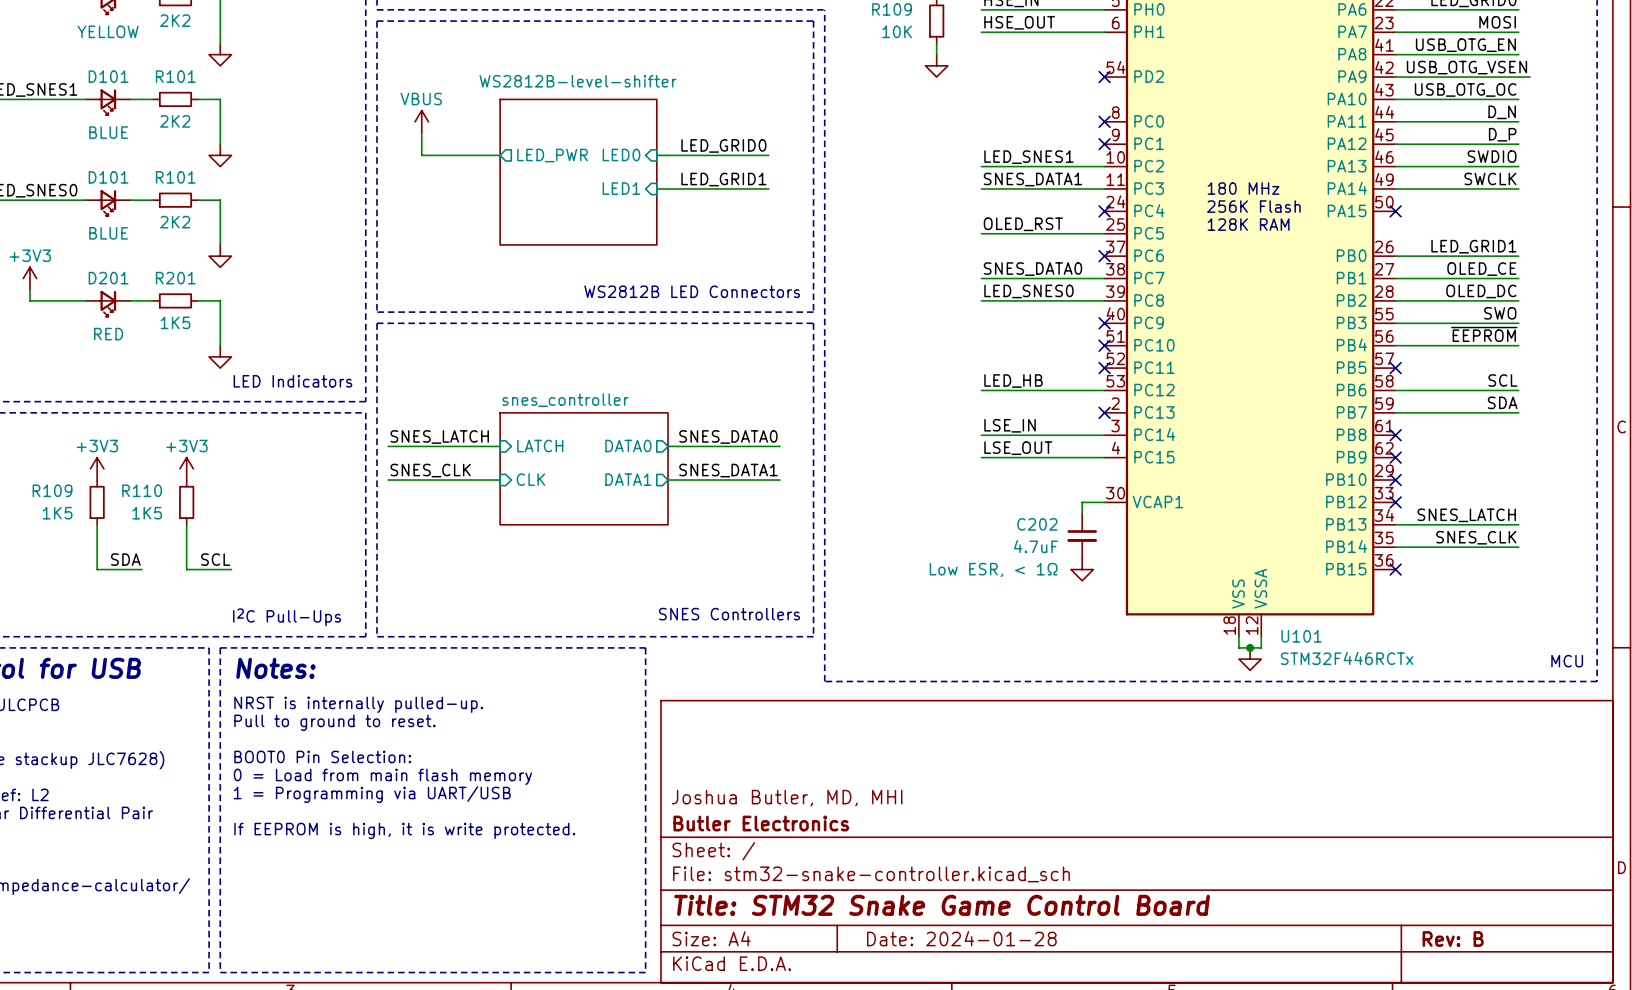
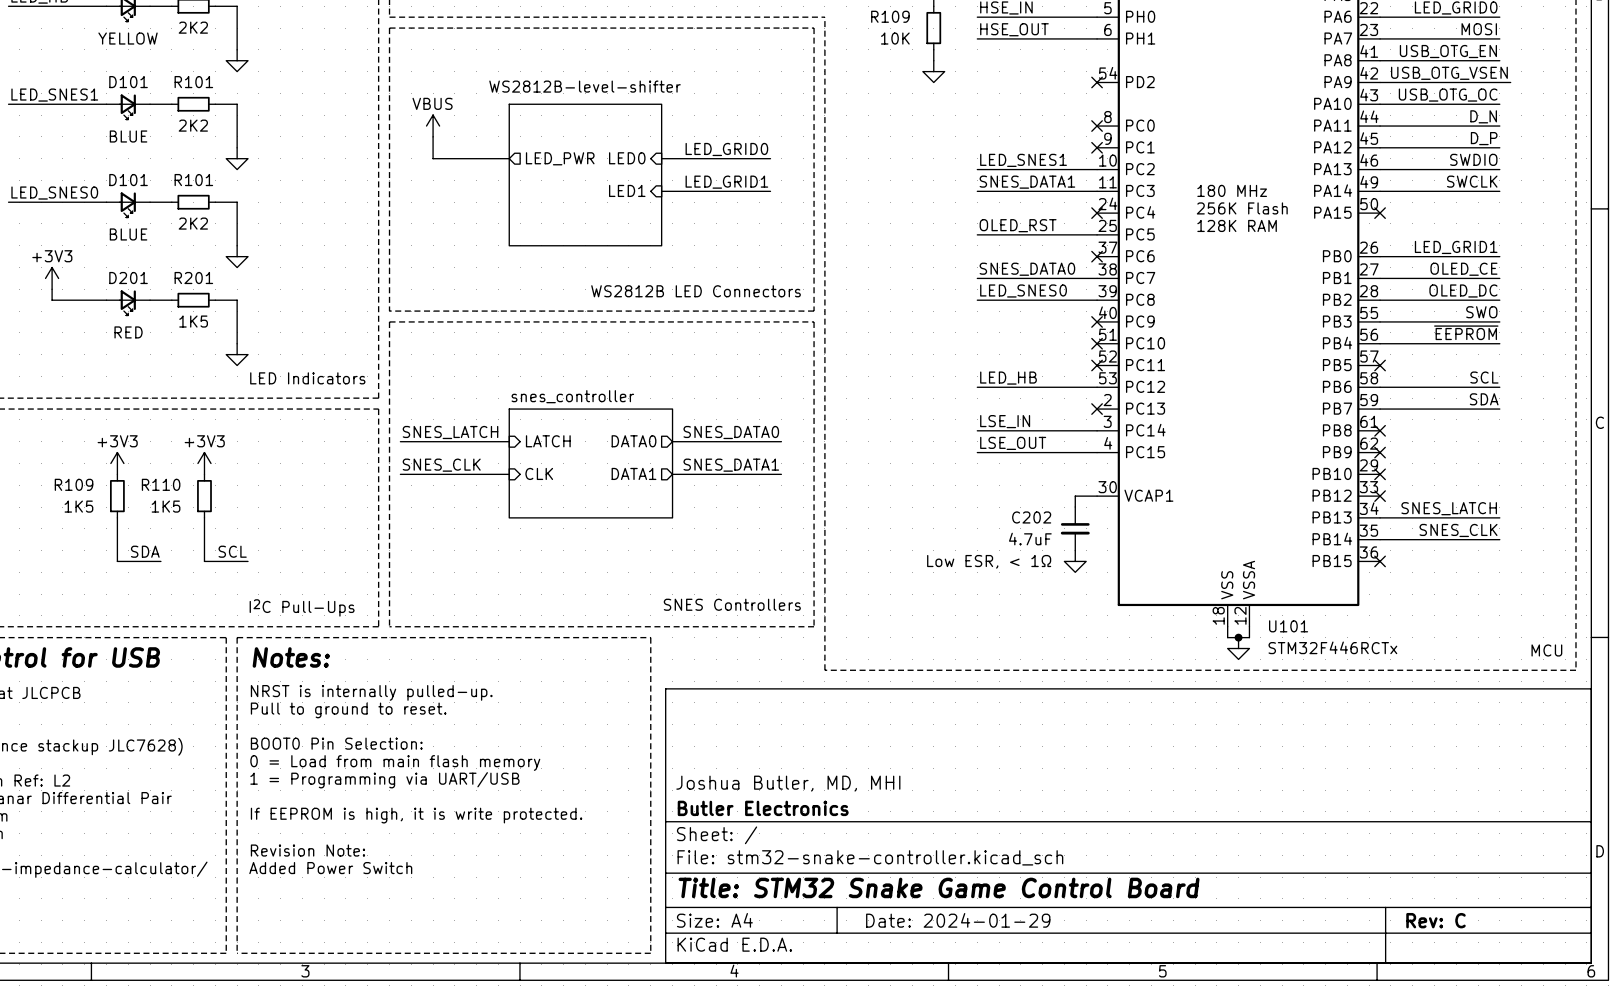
text: none -> Revision Note: (307, 850)
text: none -> Added Power Switch (330, 868)
title block: Date: 2024-01-28 (961, 938) -> Date: 2024-01-29 (958, 920)
title block: Rev: B (1453, 939) -> Rev: C (1435, 920)

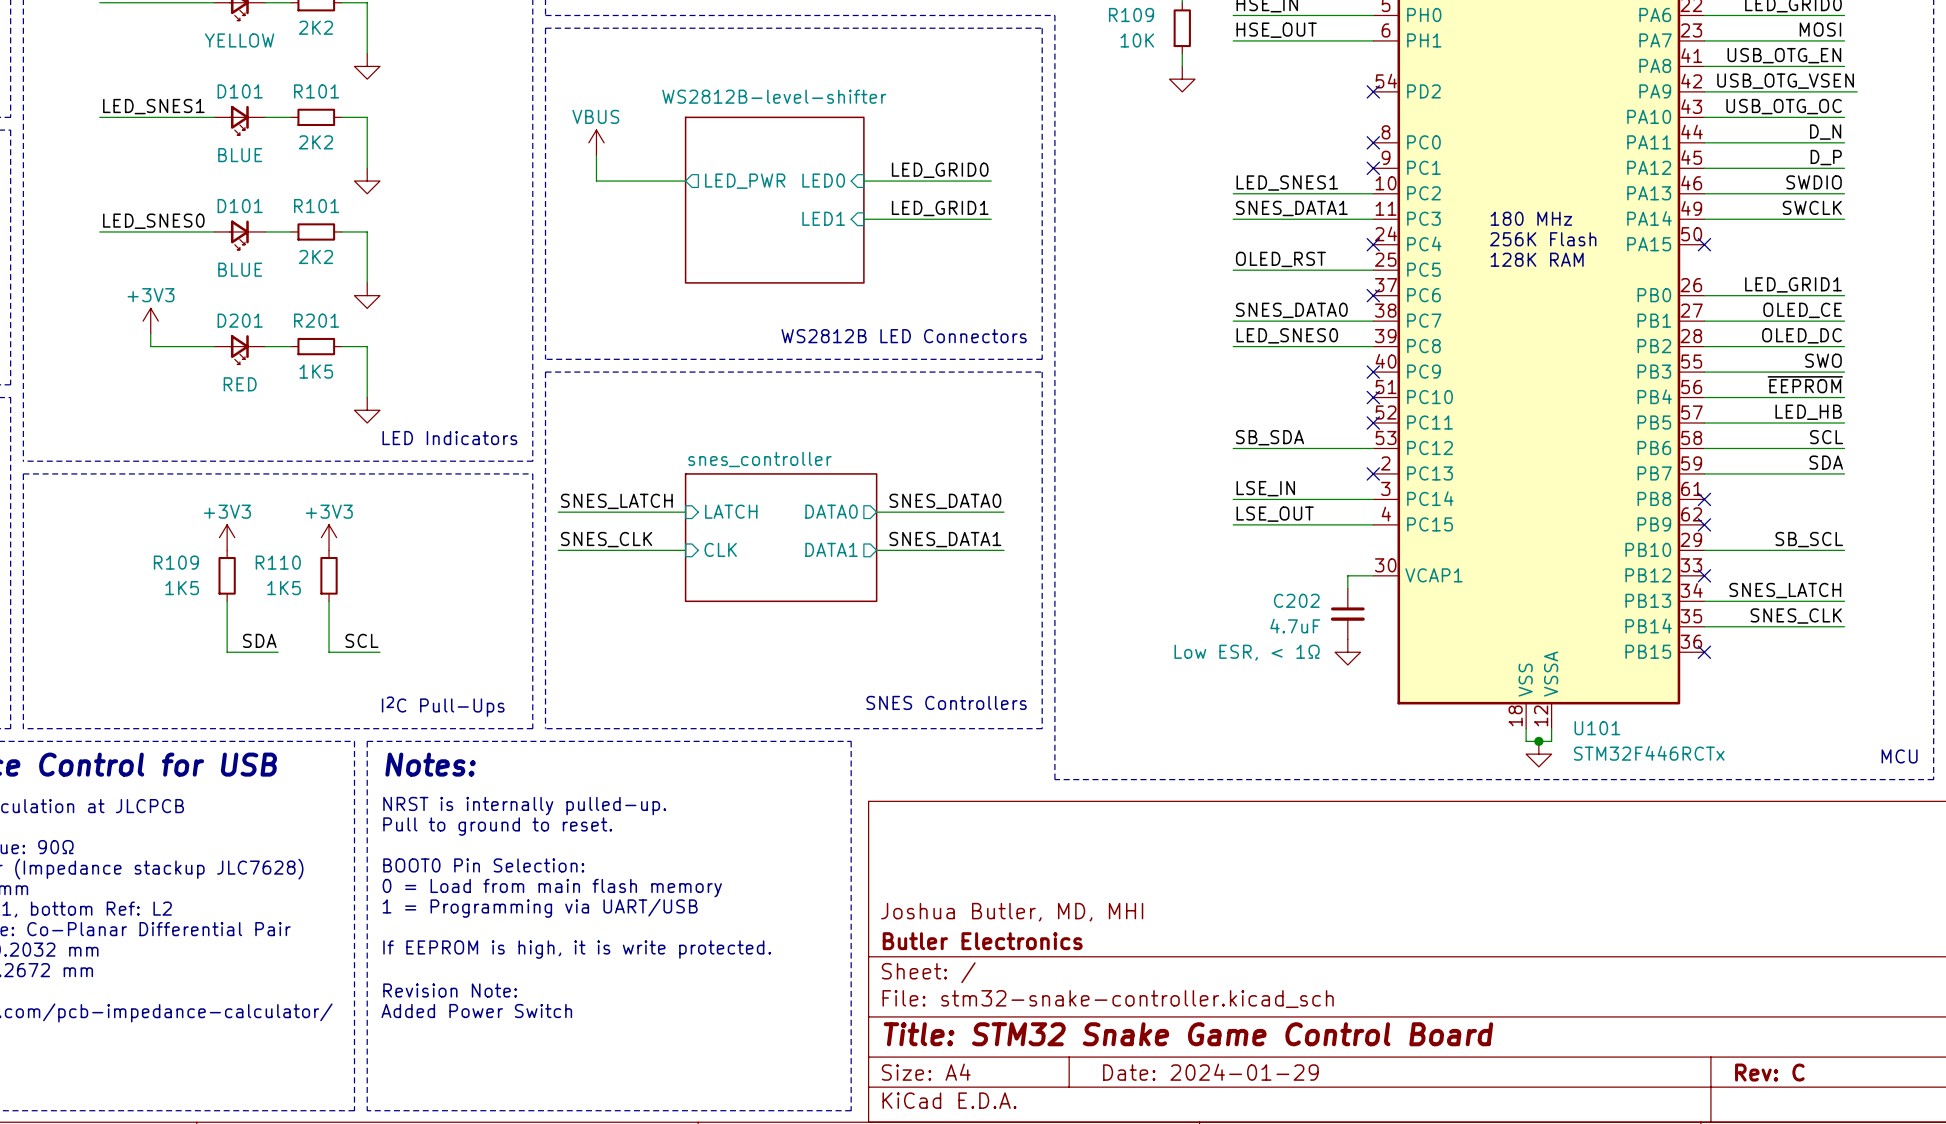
label: none -> LED_HB (1808, 412)
wire: none -> (1704, 423) (1844, 423)
no-connect mark: (1380, 365) -> none
label: LED_HB (1008, 378) -> SB_SDA (1270, 437)
label: none -> SB_SCL (1809, 539)
wire: none -> (1704, 550) (1844, 550)
no-connect mark: (1380, 474) -> none

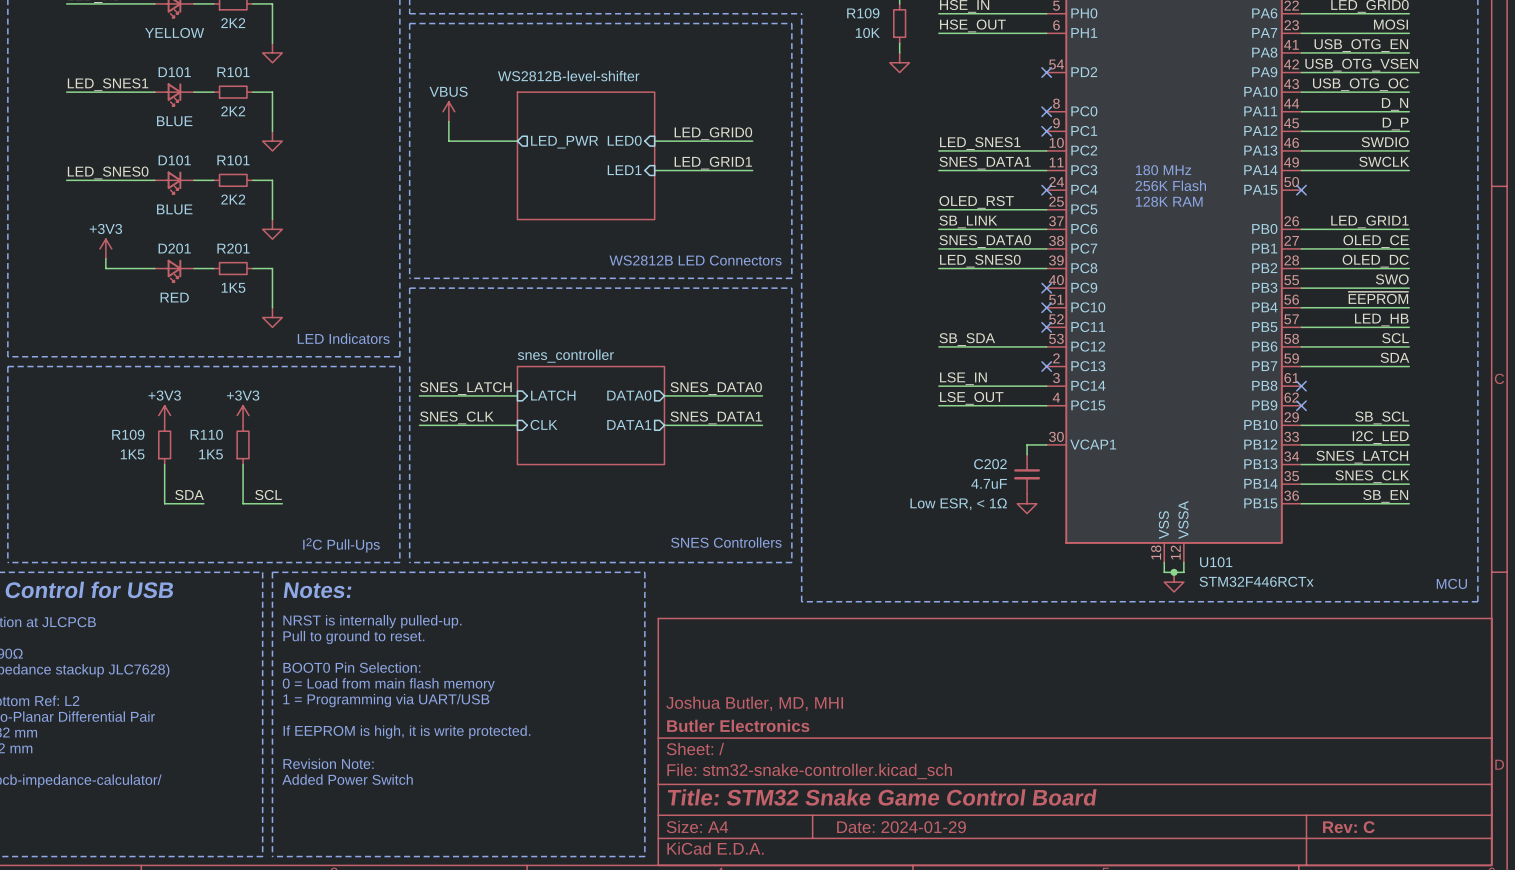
label: none -> SB_LINK (968, 221)
wire: none -> (938, 229) (1046, 229)
no-connect mark: (1373, 295) -> none
label: none -> I2C_LED (1380, 437)
wire: none -> (1301, 444) (1409, 444)
no-connect mark: (1704, 575) -> none
label: none -> SB_EN (1385, 496)
wire: none -> (1301, 503) (1409, 503)
no-connect mark: (1704, 652) -> none

